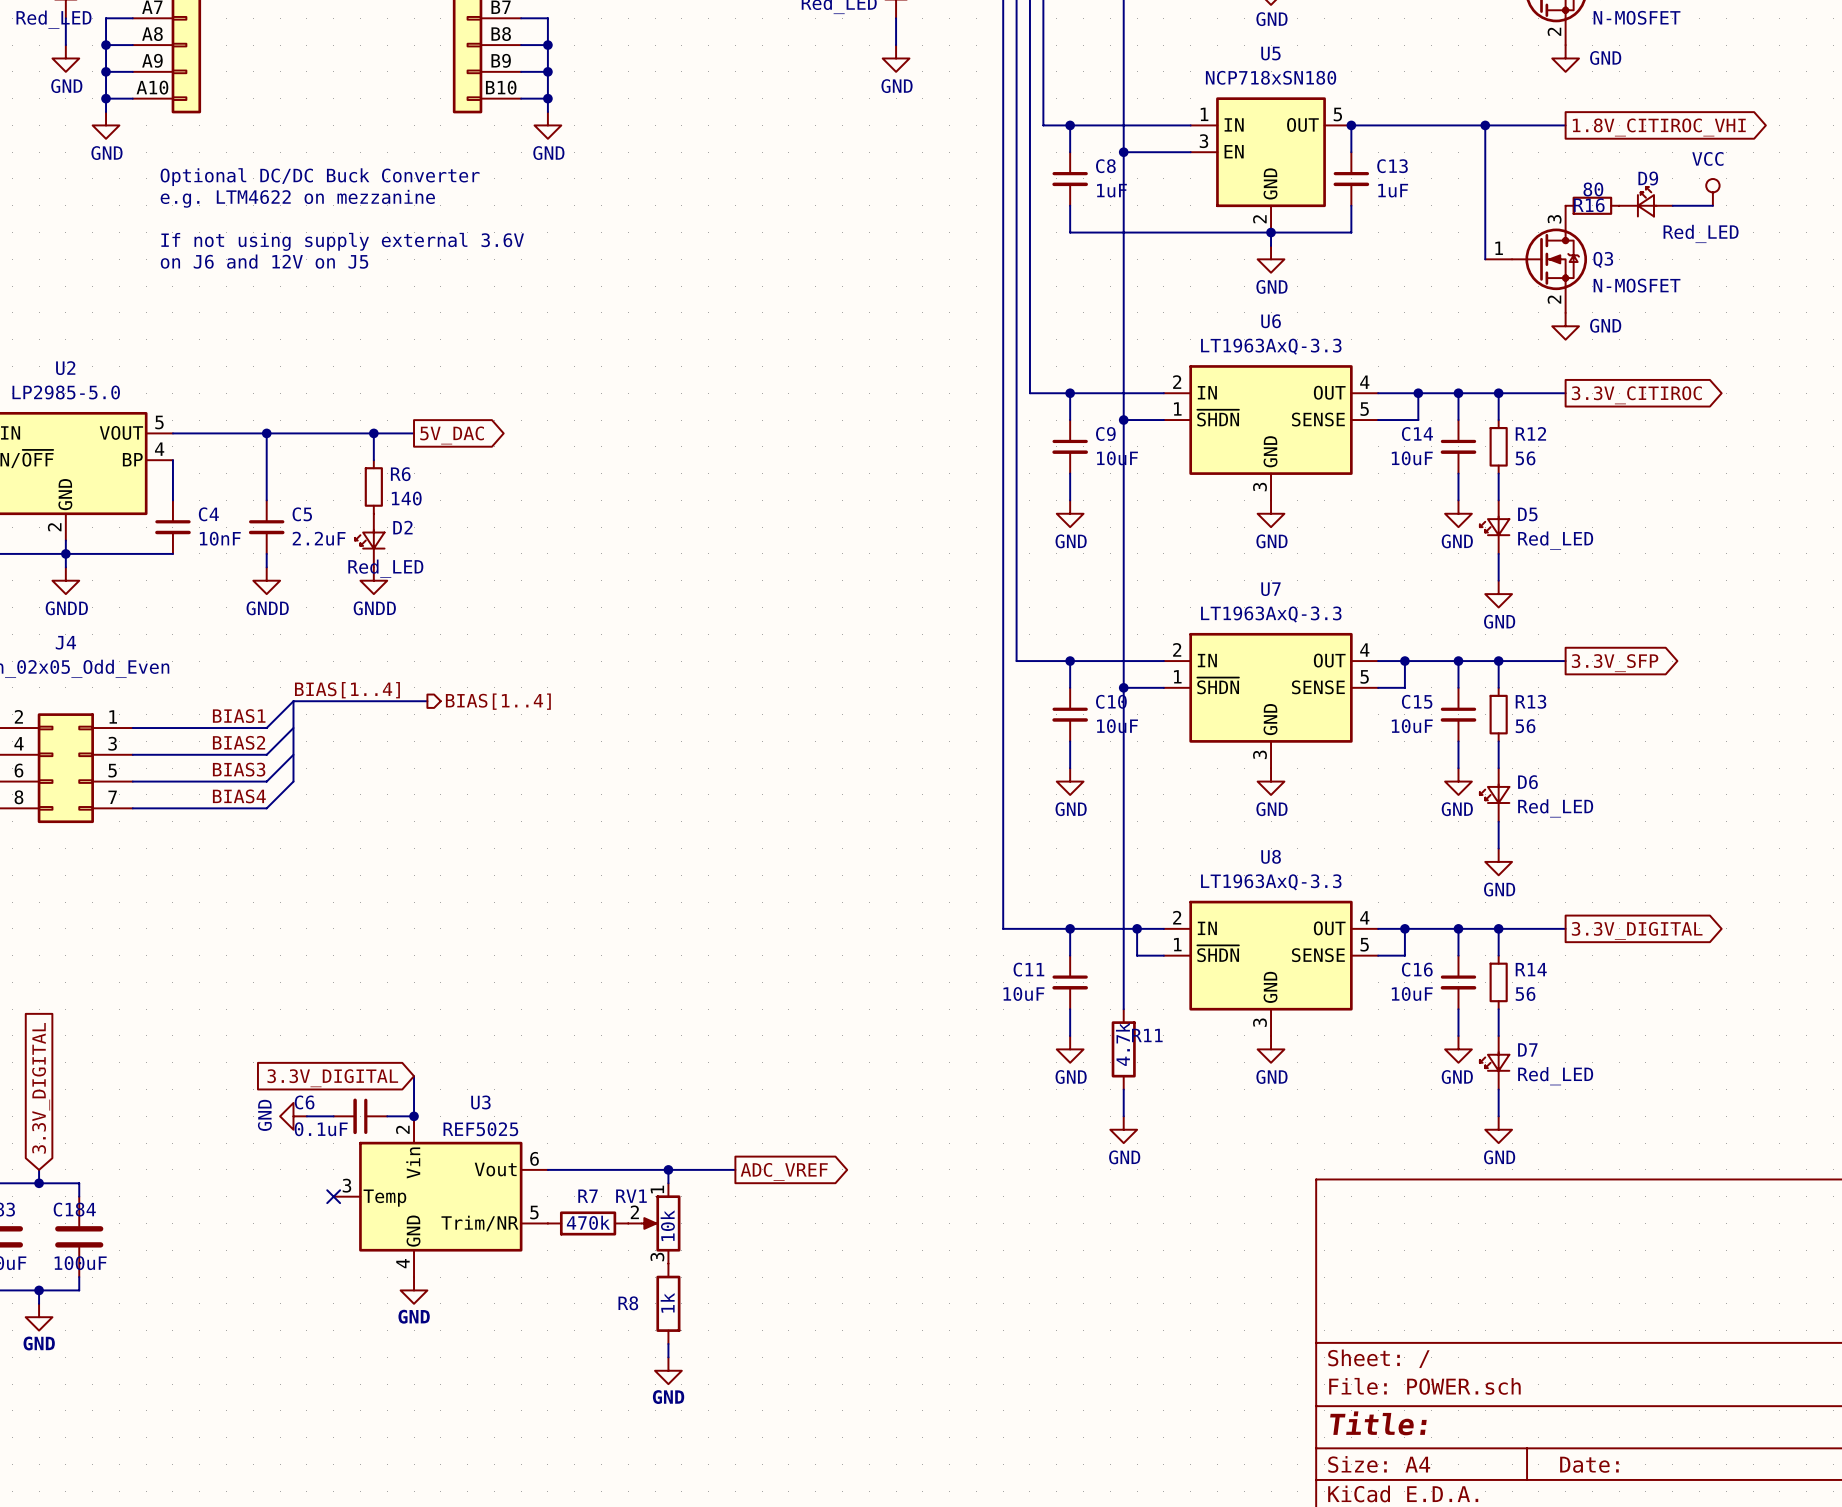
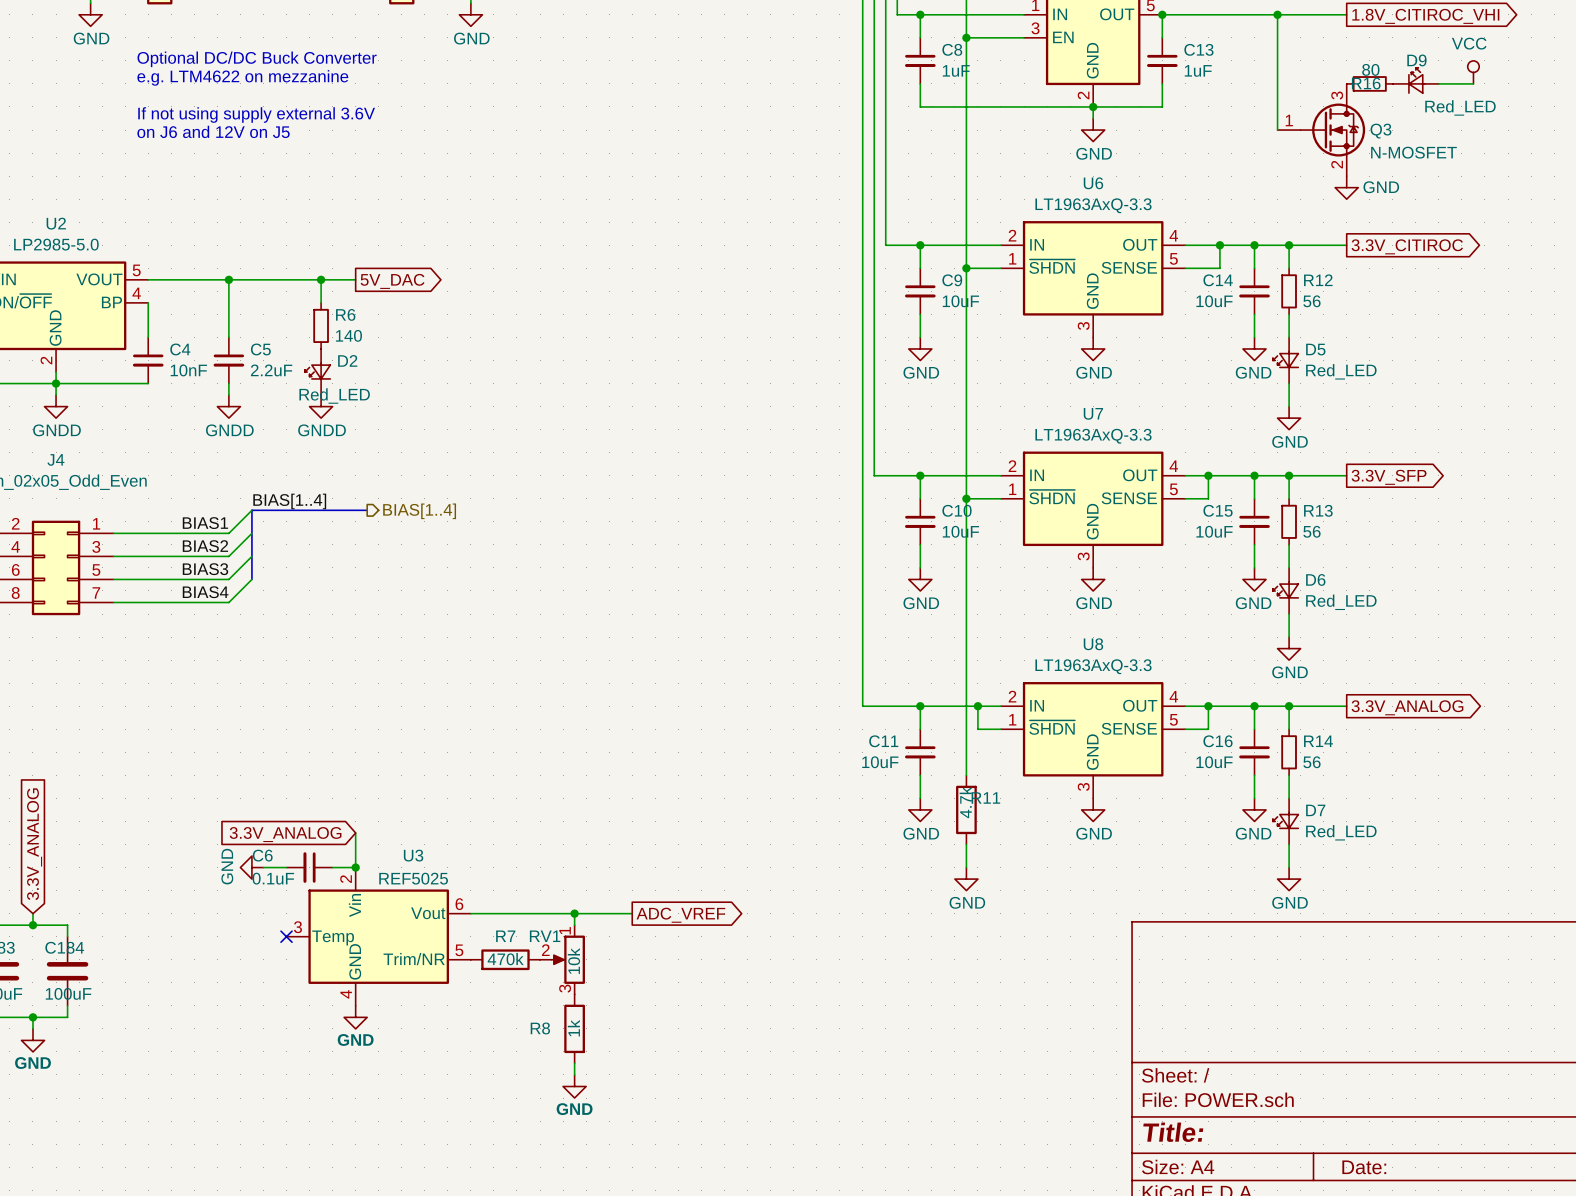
global label: 3.3V_DIGITAL (1637, 930) -> 3.3V_ANALOG (1407, 707)
global label: 3.3V_DIGITAL (332, 1078) -> 3.3V_ANALOG (285, 834)
global label: 3.3V_DIGITAL (41, 1088) -> 3.3V_ANALOG (34, 844)

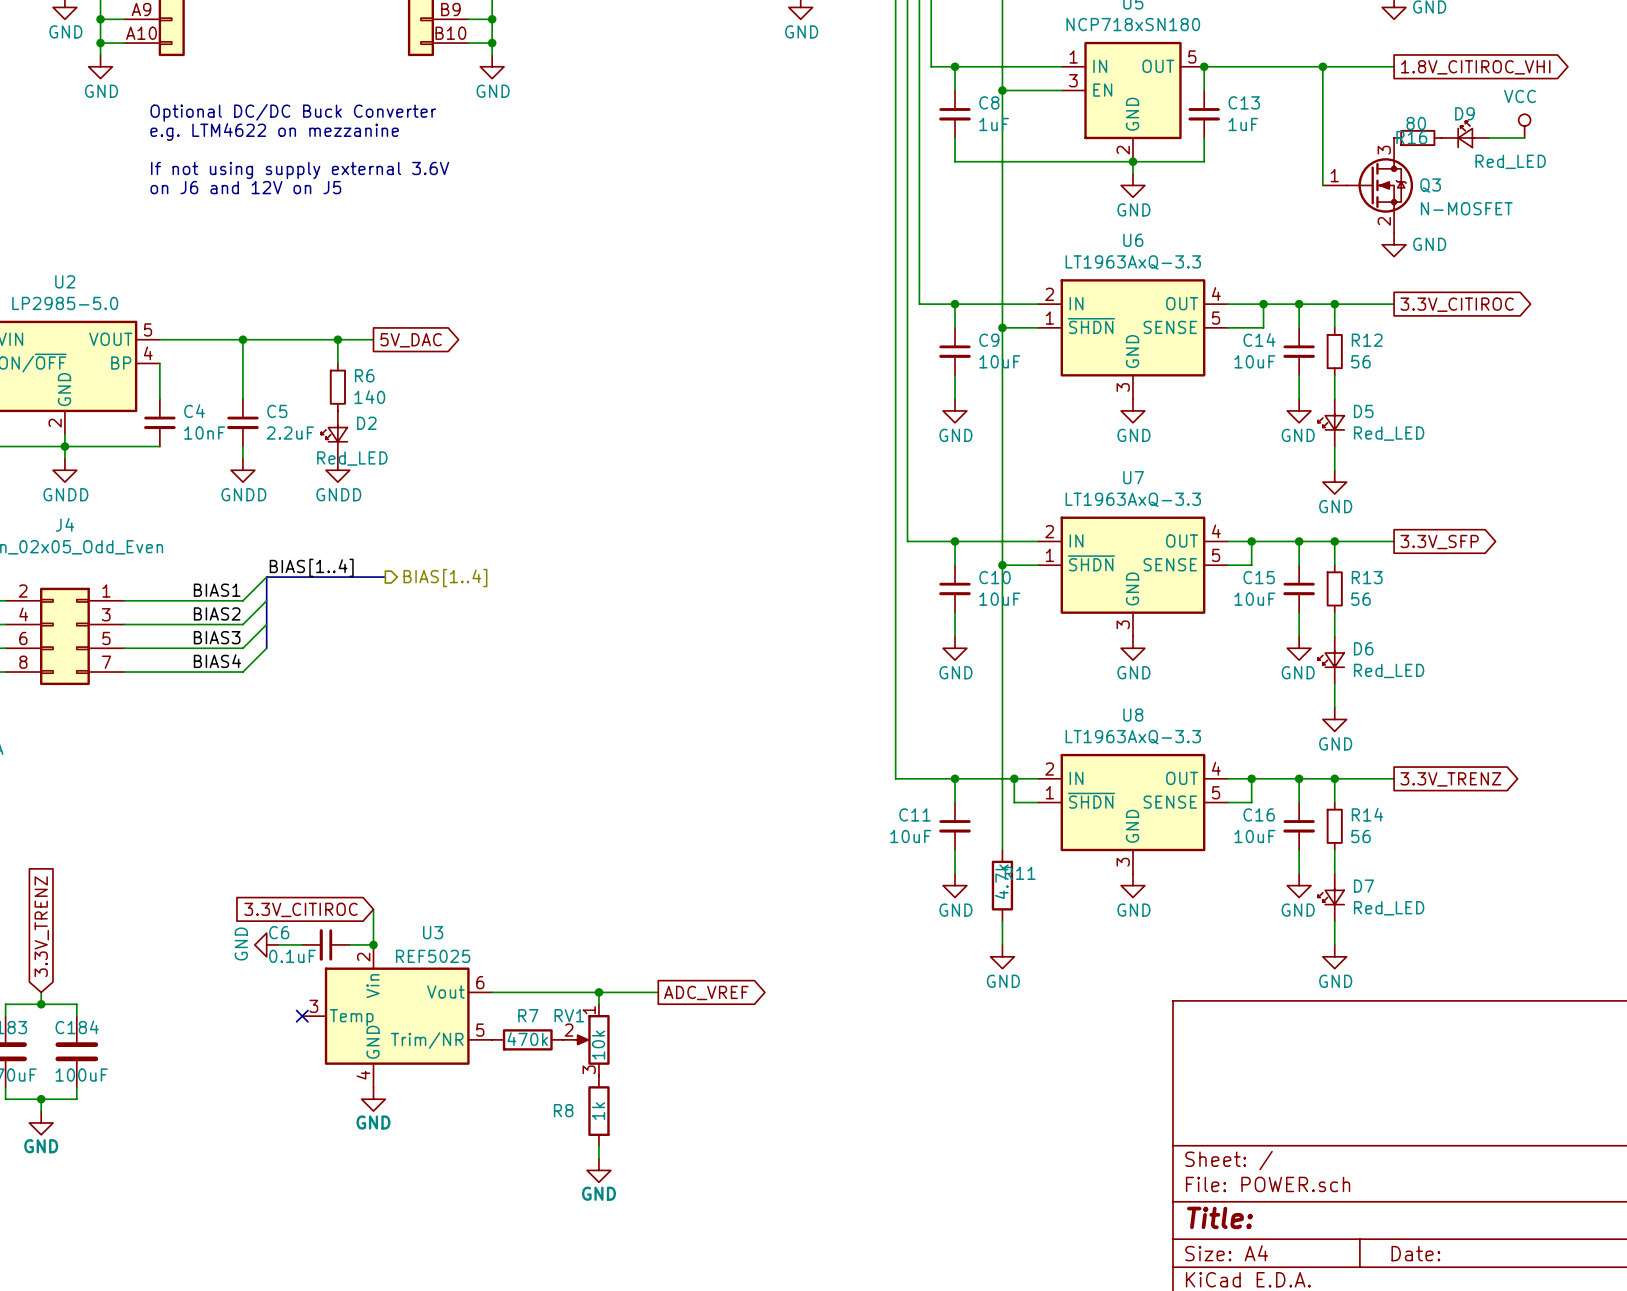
global label: 3.3V_ANALOG (1407, 707) -> 3.3V_TRENZ (1450, 779)
global label: 3.3V_ANALOG (285, 834) -> 3.3V_CITIROC (300, 909)
global label: 3.3V_ANALOG (34, 844) -> 3.3V_TRENZ (41, 926)

